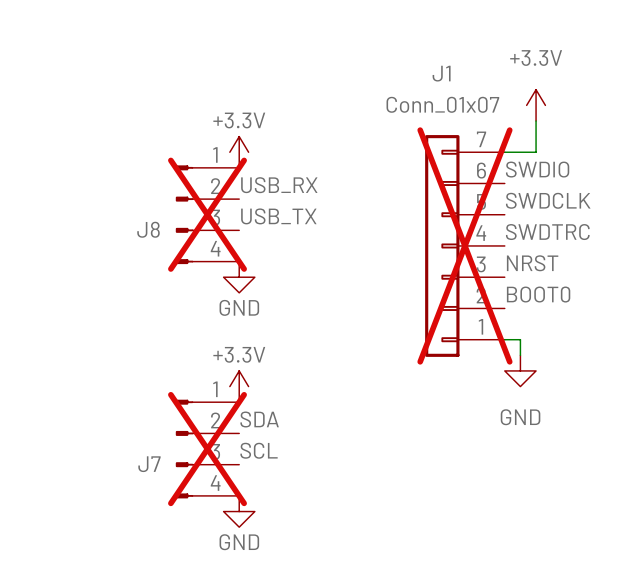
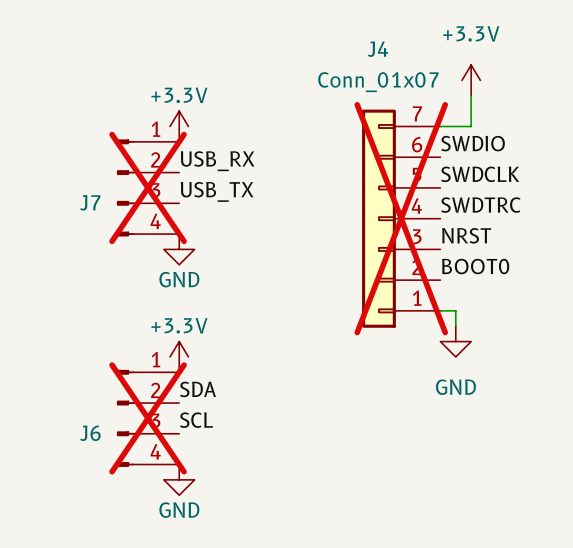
J1 name: J1 (441, 73) -> J4 (377, 49)
J8 name: J8 (148, 229) -> J7 (90, 202)
J7 name: J7 (149, 464) -> J6 (90, 433)

